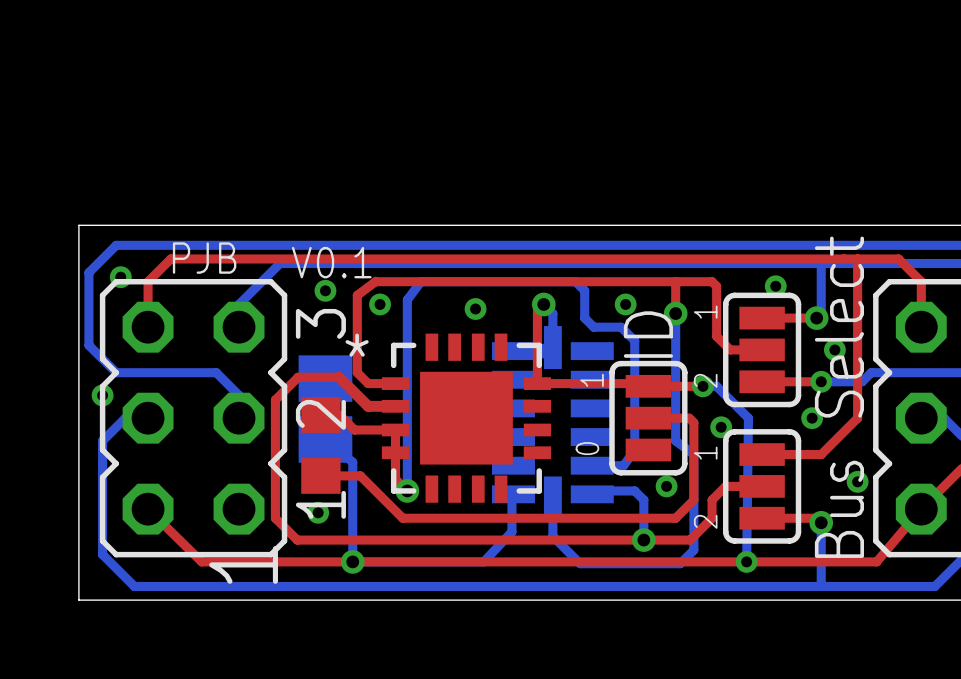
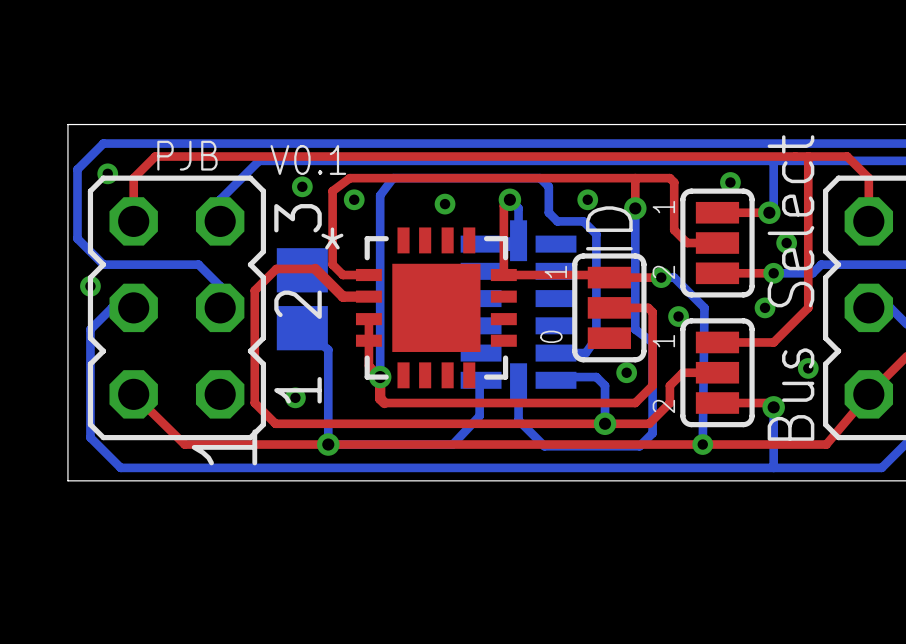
top track: (320, 415) (339, 415) (354, 430) (395, 430) -> none
part: (320, 445) -> none
top track: (320, 475) (360, 475) (402, 518) (411, 518) -> (380, 377) (380, 398) (384, 403)

